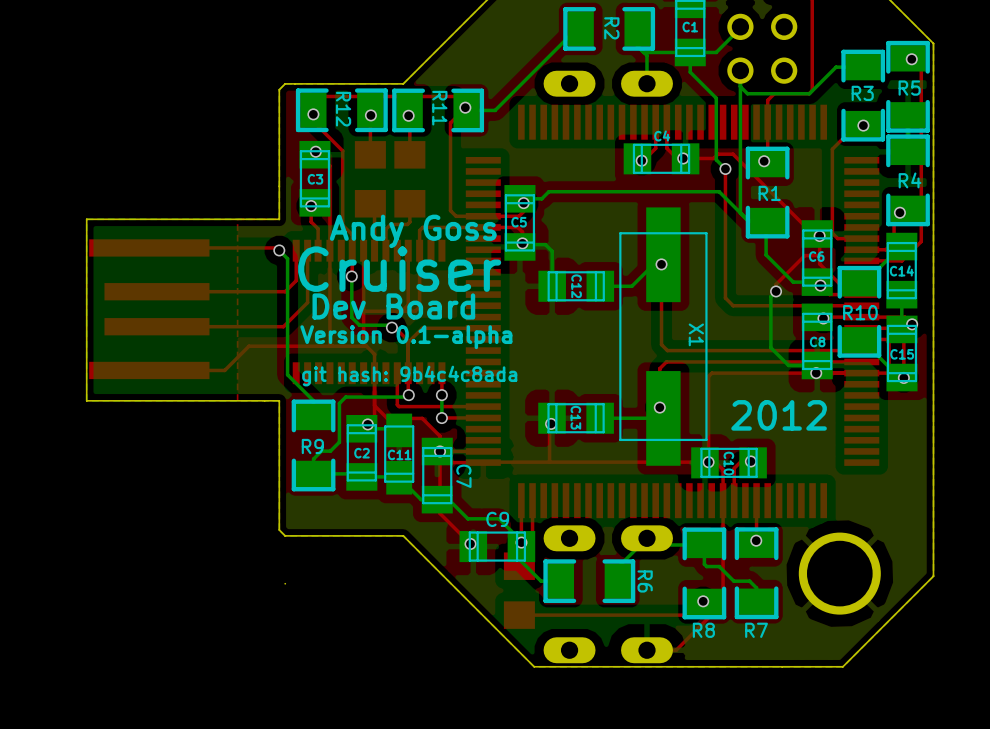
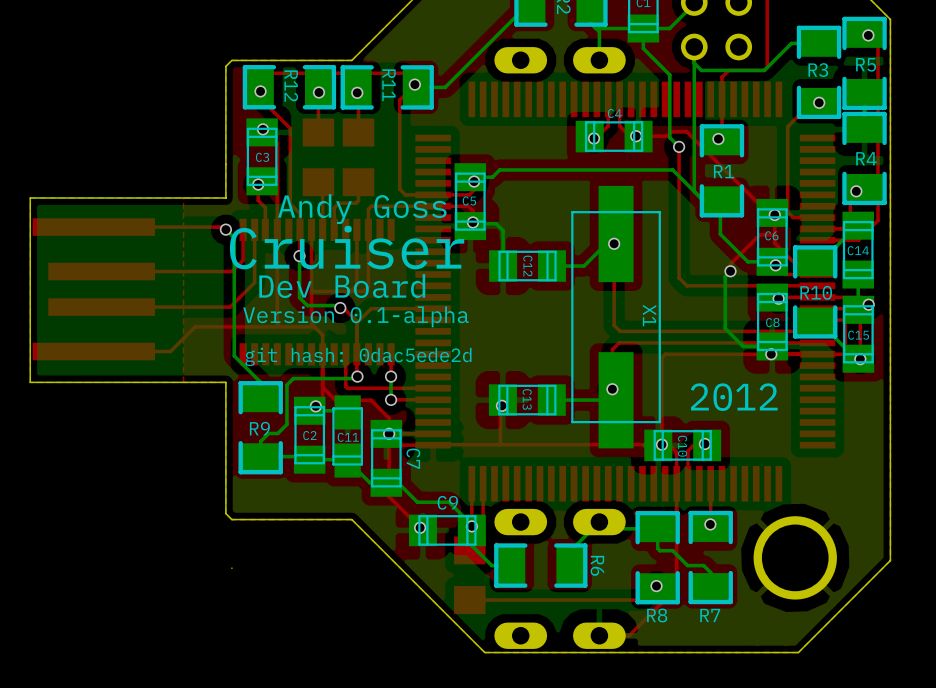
text: git hash: 9b4c4c8ada (409, 376) -> git hash: 0dac5ede2d (358, 356)

